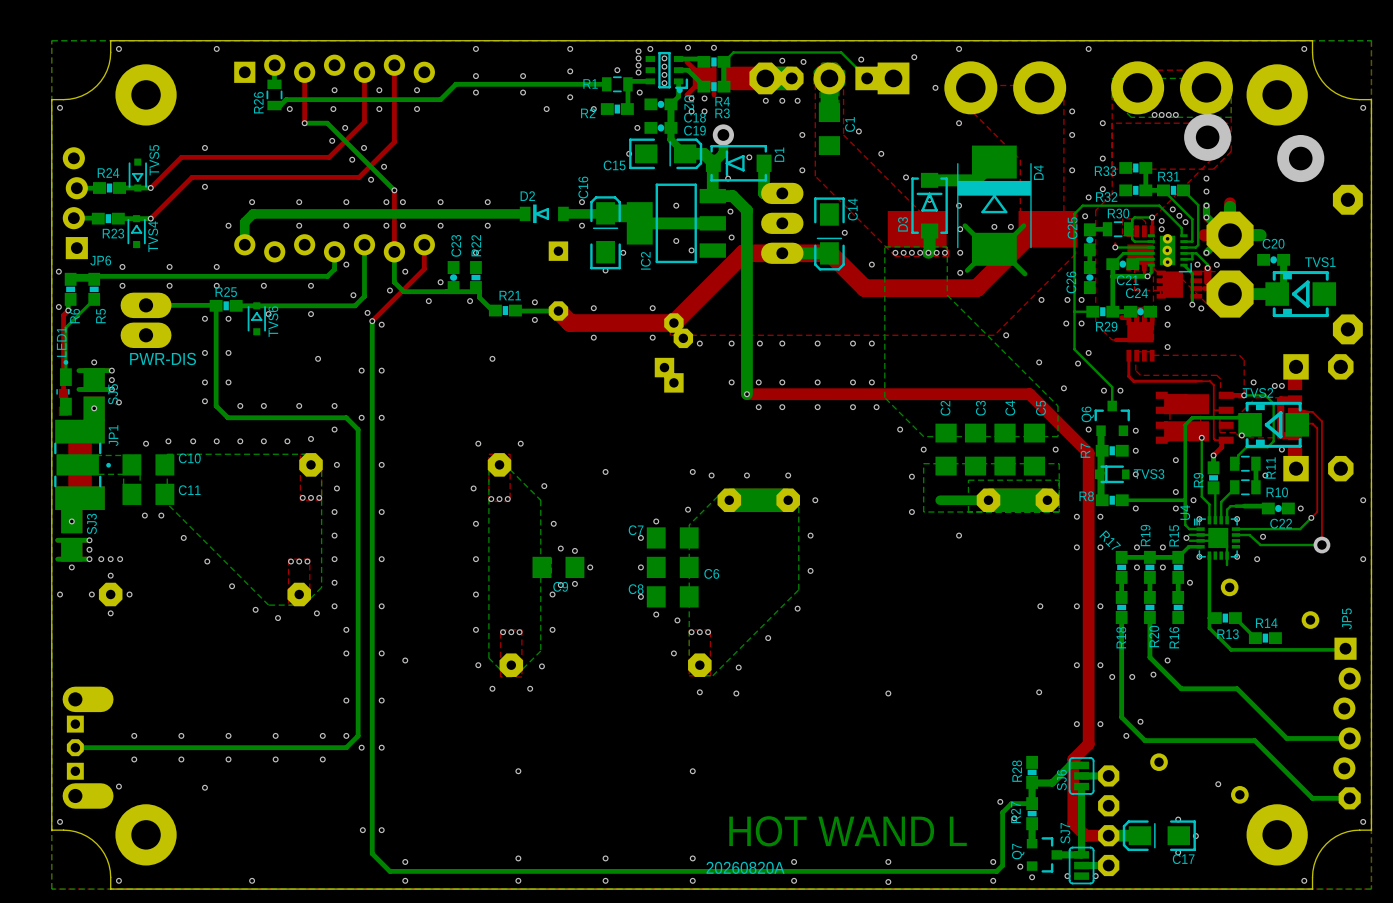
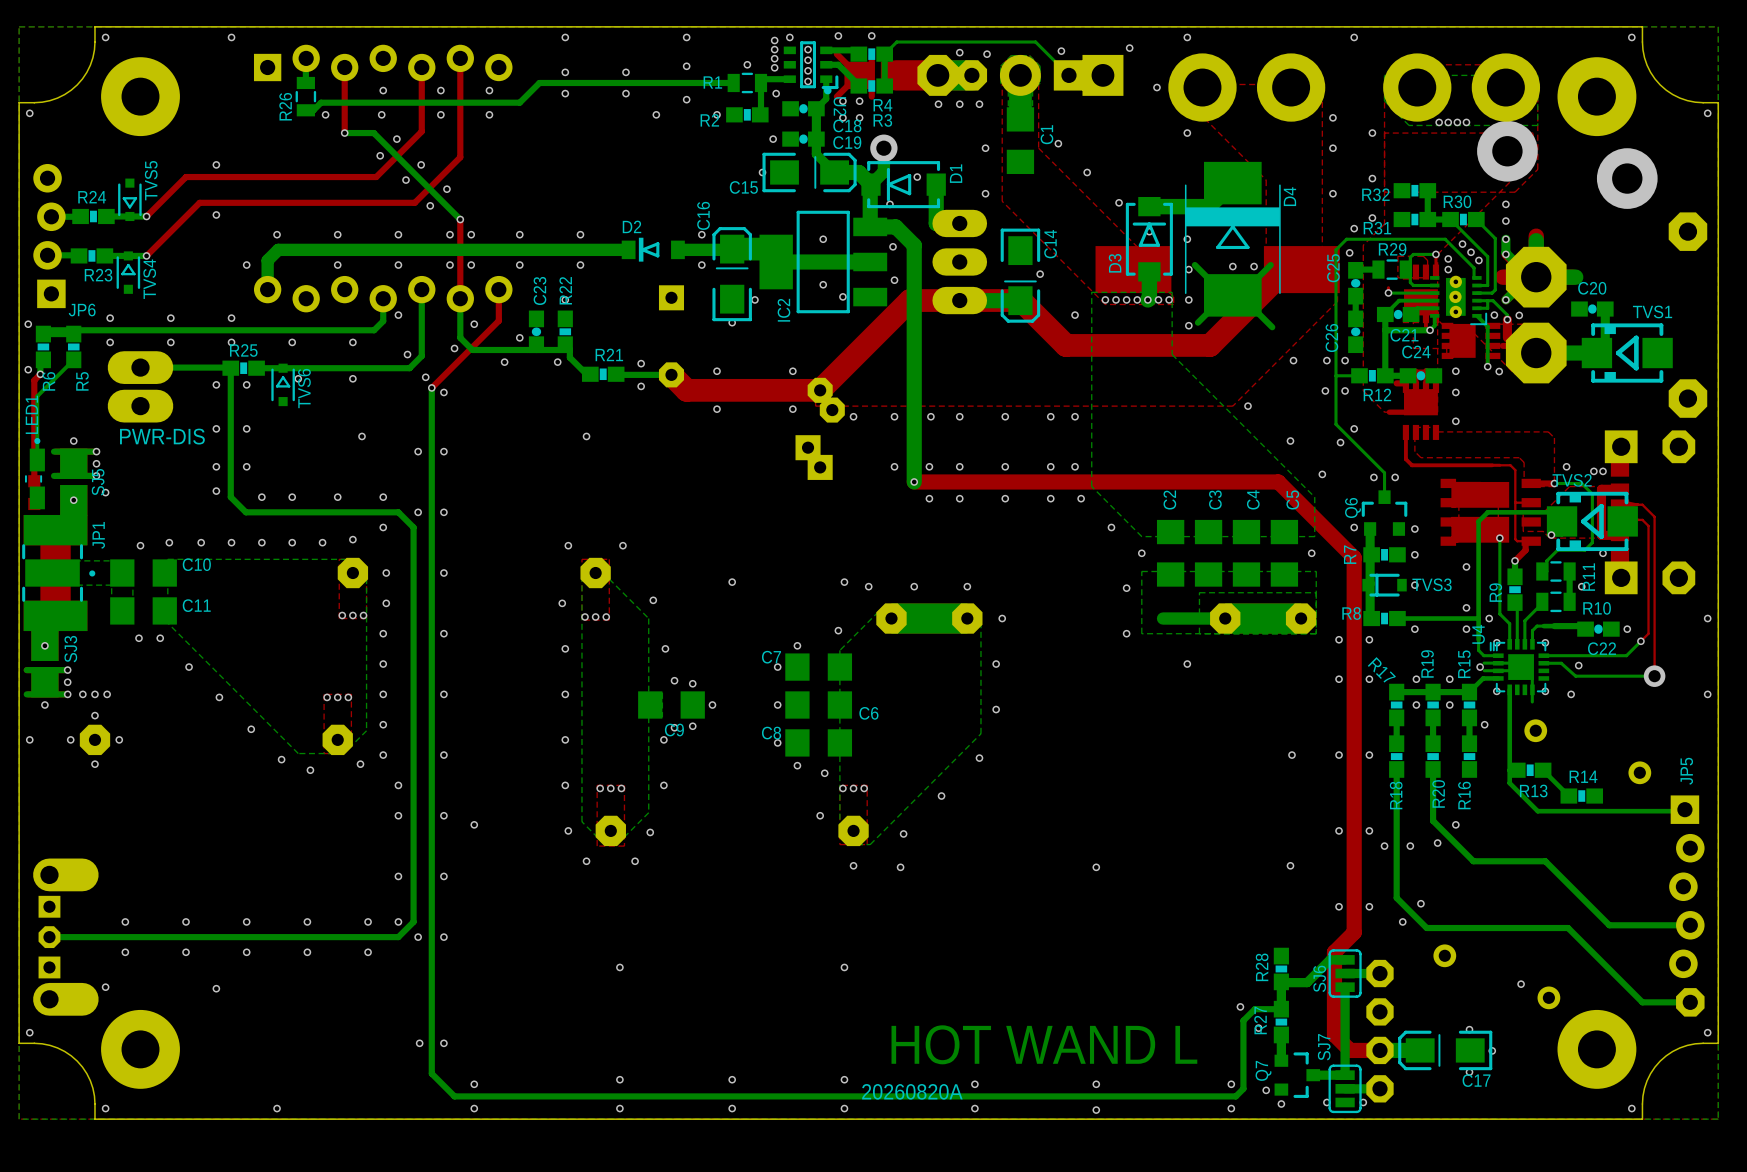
R33 name: R33 (1105, 171) -> R32 (1375, 194)
R31 name: R31 (1168, 176) -> R30 (1457, 201)
R32 name: R32 (1106, 197) -> R31 (1377, 228)
R30 name: R30 (1118, 213) -> R29 (1392, 249)
R29 name: R29 (1106, 326) -> R12 (1377, 394)

